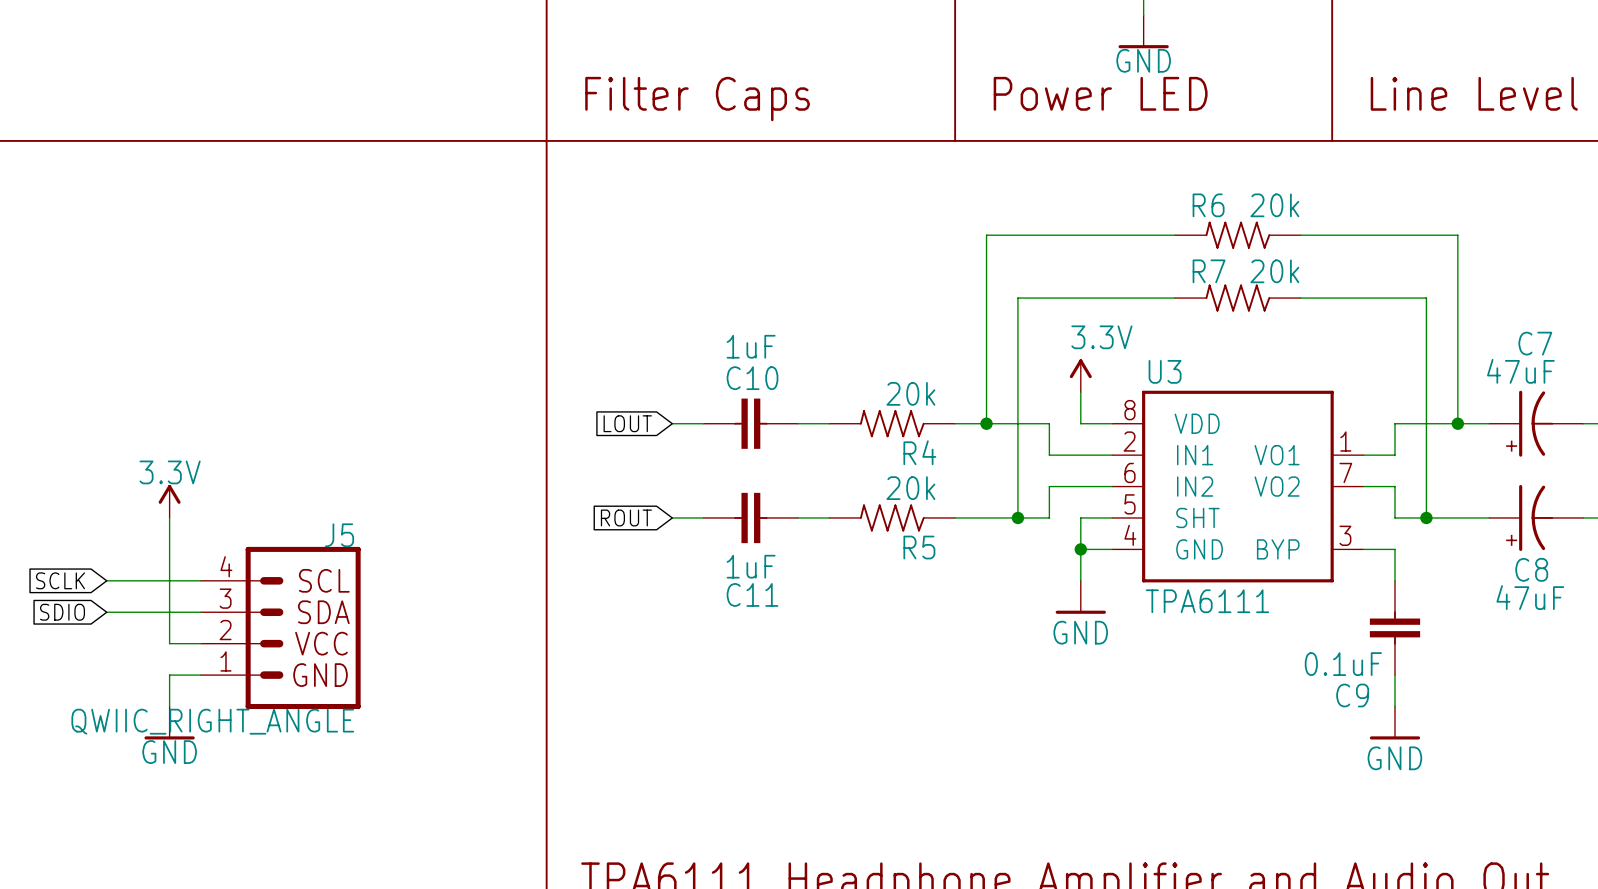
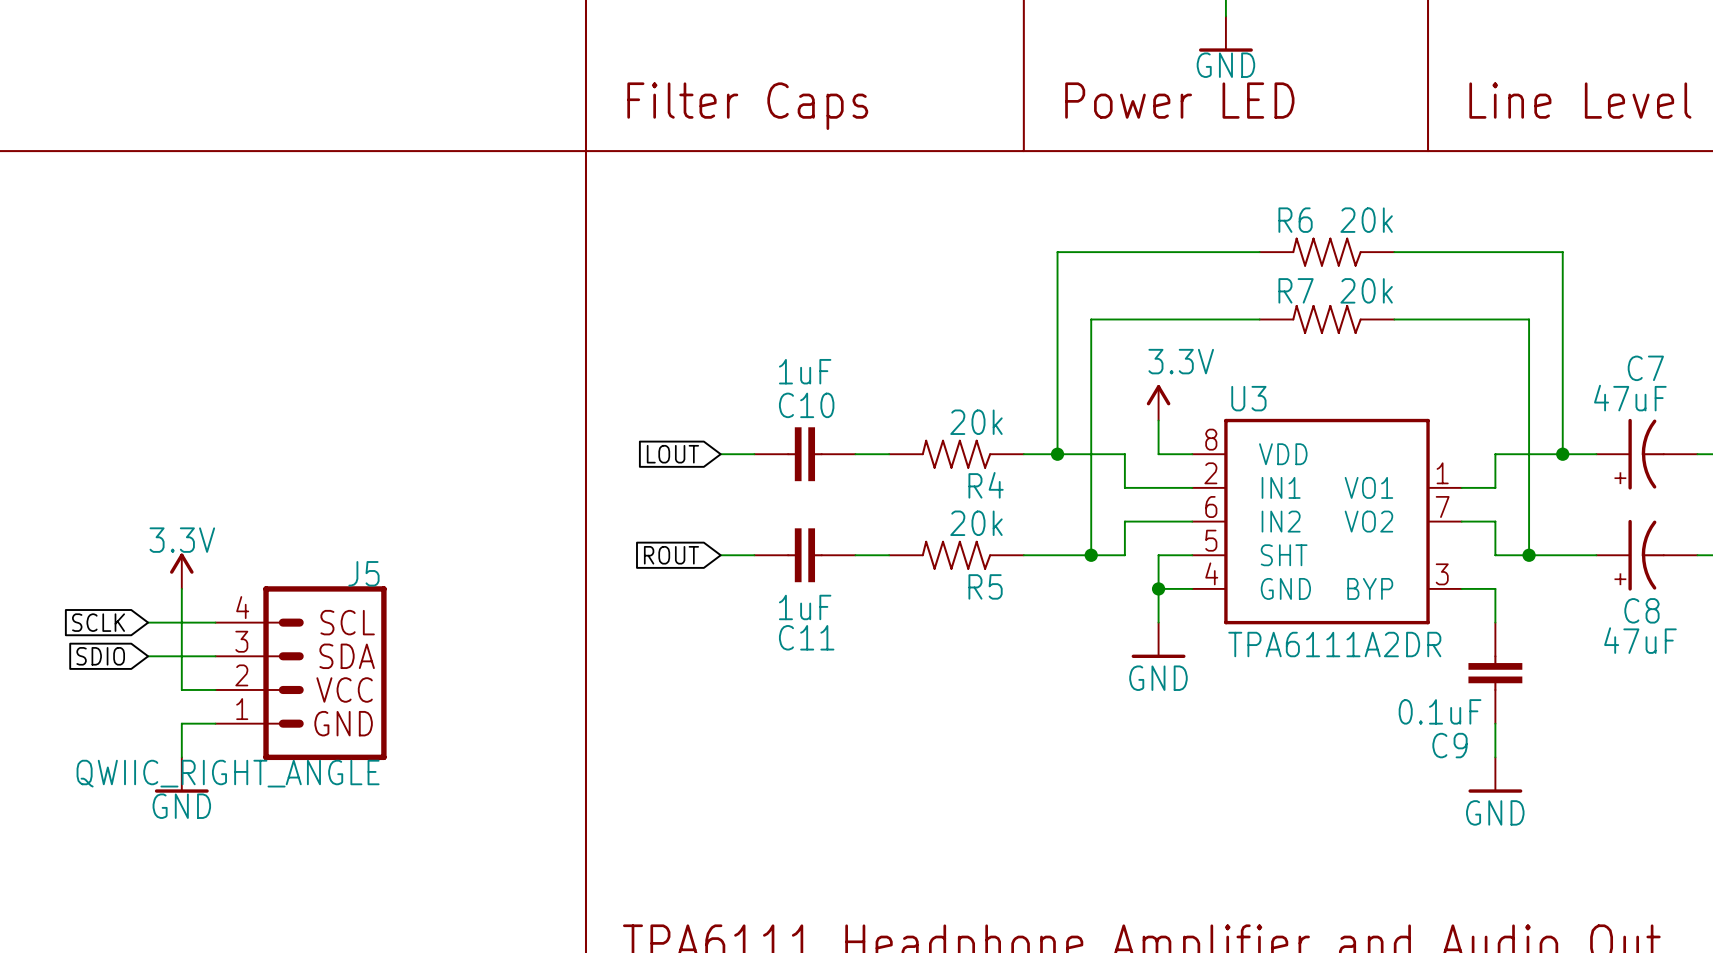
power symbol position: 3.3V (169, 501) -> 3.3V (181, 571)
global label position: SCLK (60, 580) -> SCLK (98, 622)
wire: (106, 580) (138, 580) -> none
U3 value: TPA6111 (1207, 601) -> TPA6111A2DR (1334, 644)
global label position: SDIO (62, 612) -> SDIO (100, 656)
wire: (106, 612) (138, 612) -> none

